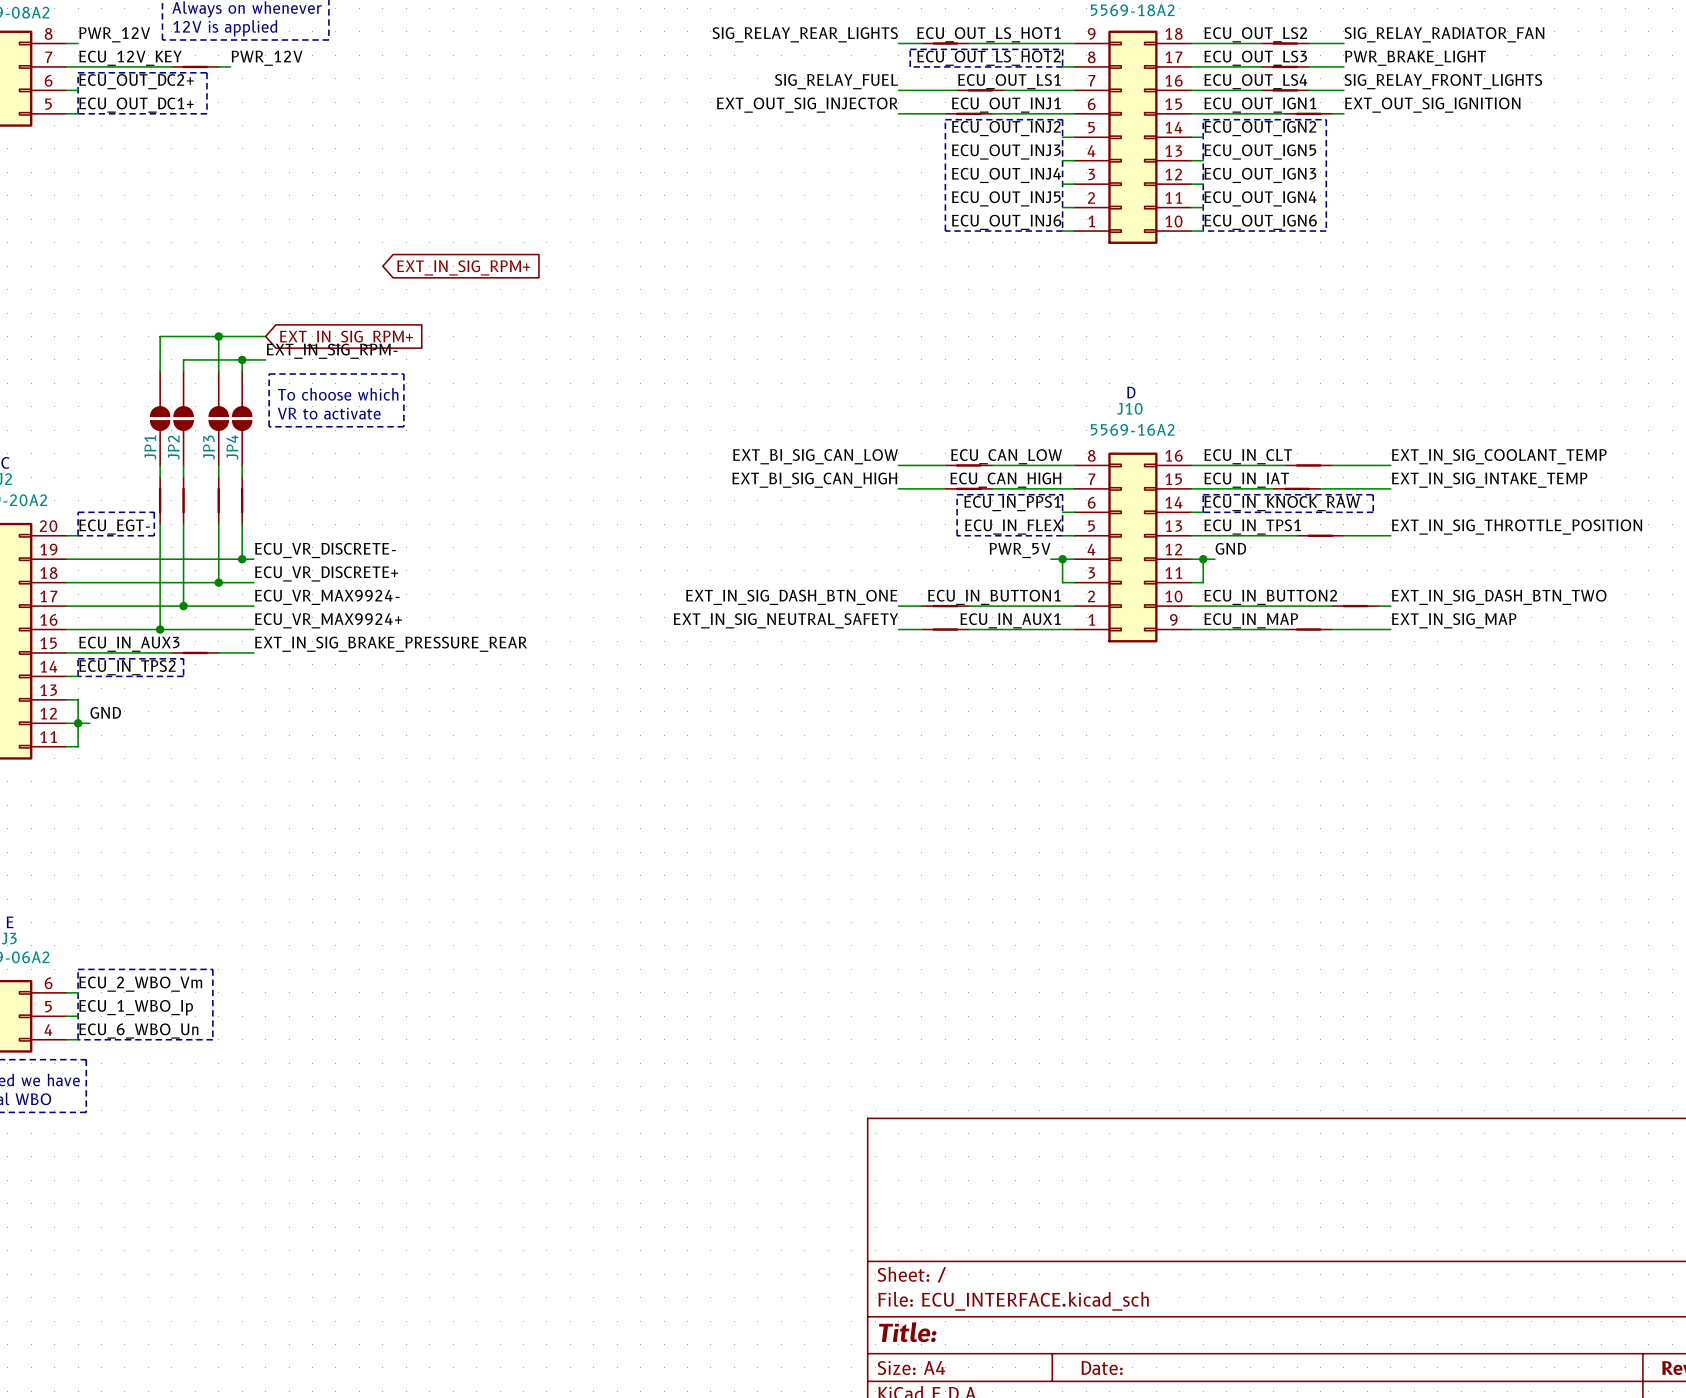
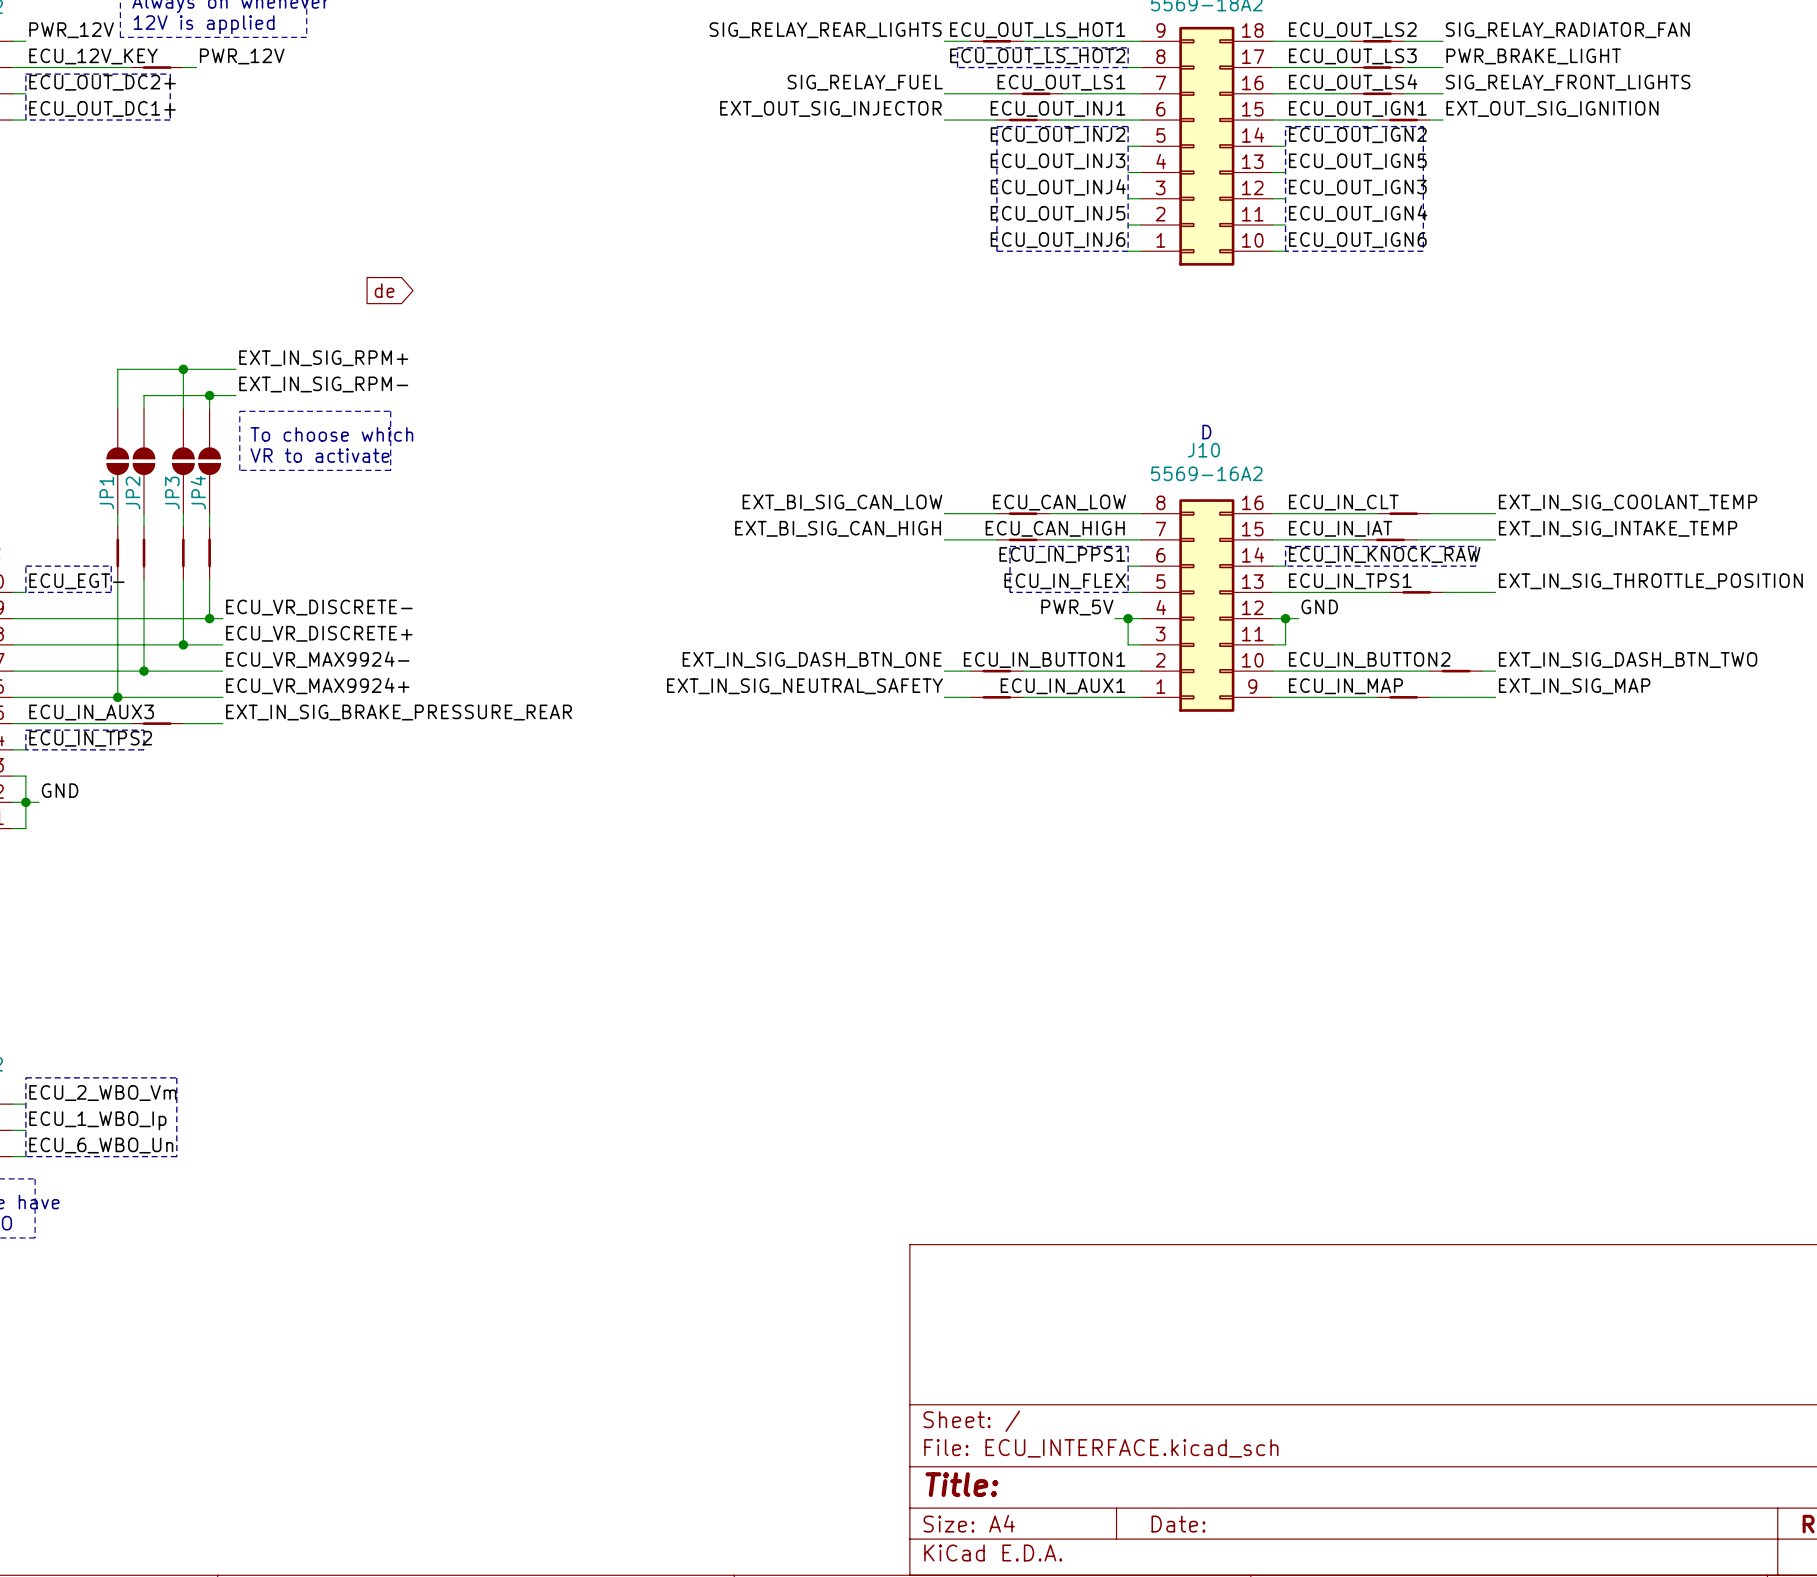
global label shape: input (463, 267) -> output (384, 290)
global label: EXT_IN_SIG_RPM+ (463, 267) -> de (384, 290)
label: none -> EXT_IN_SIG_RPM+ (323, 358)
global label: EXT_IN_SIG_RPM+ (346, 338) -> none

